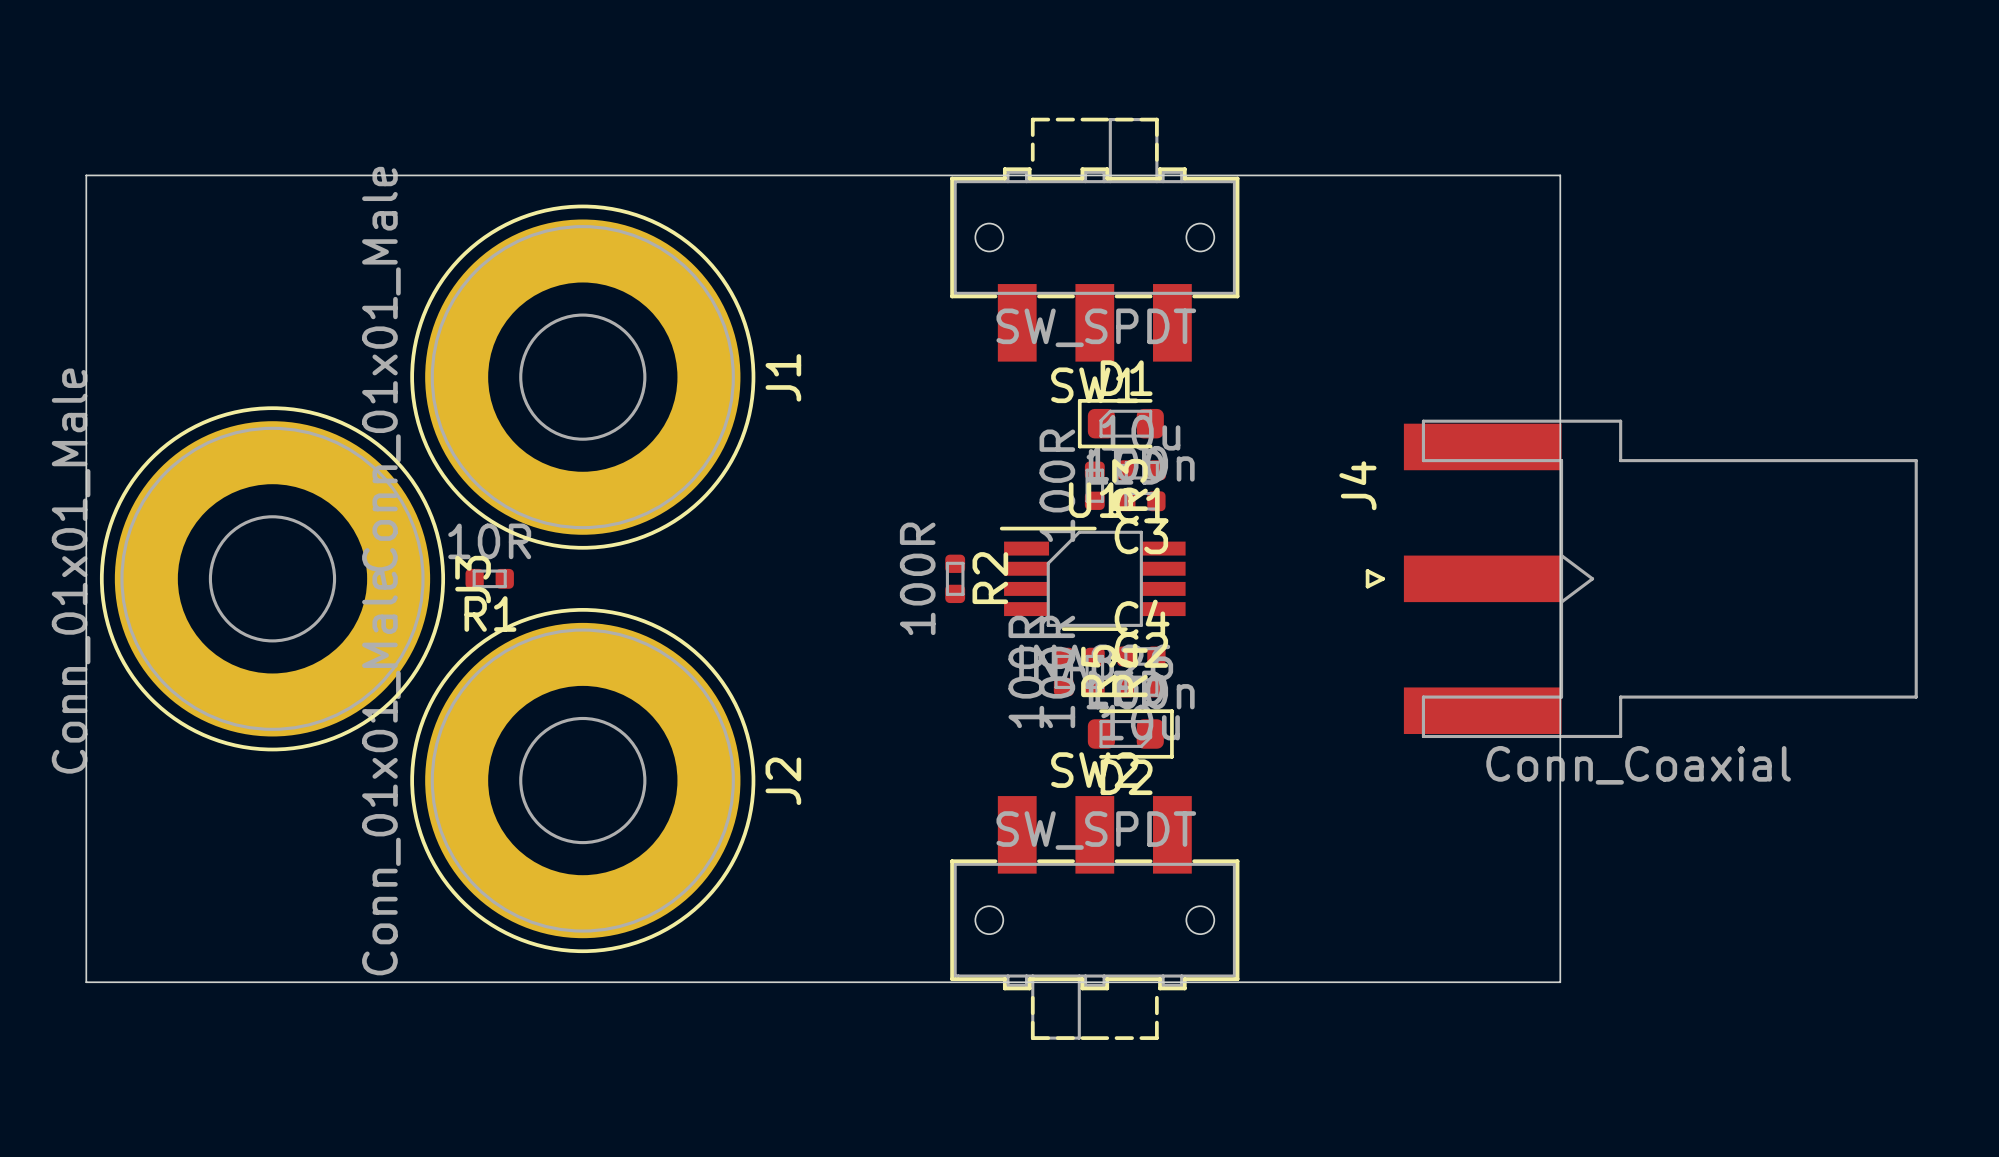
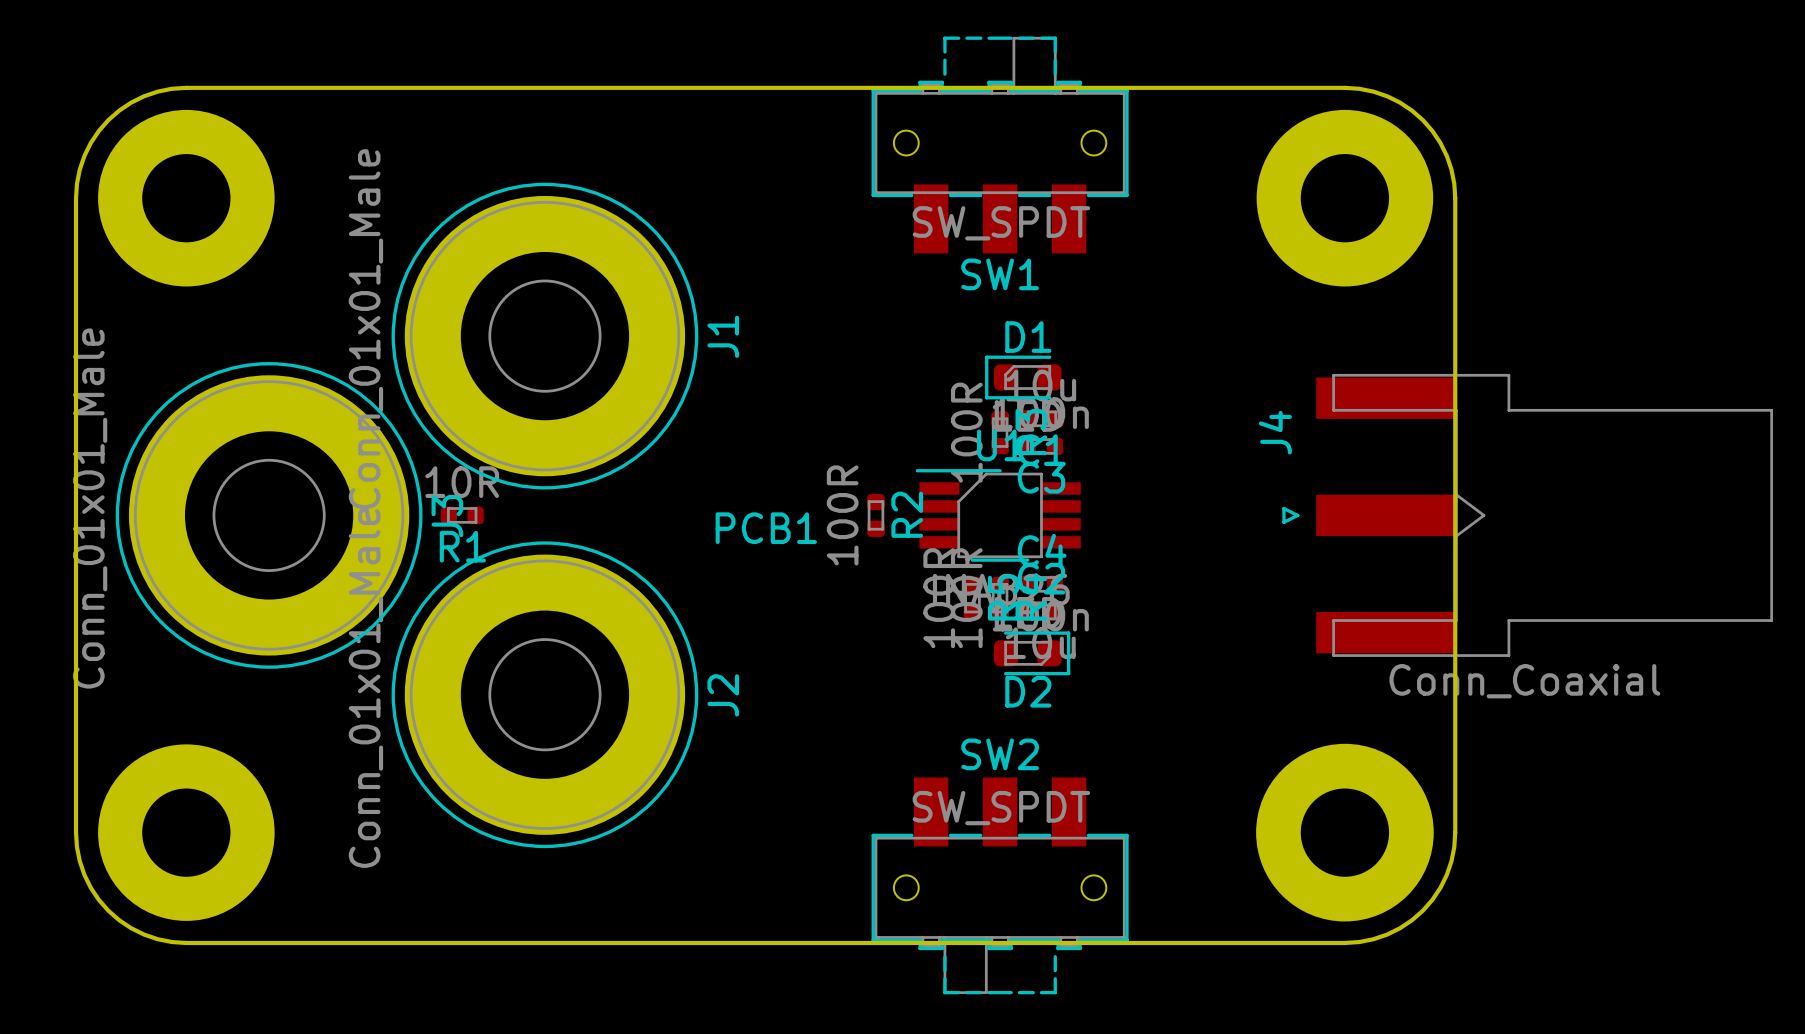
board edge: (86, 175) (1560, 175) (1560, 982) (86, 982) (86, 175) -> none
SW1 position: (1094, 239) -> (1000, 144)
PCB1: none -> (765, 515)
J4 position: (1641, 578) -> (1527, 515)
SW2 position: (1094, 918) -> (1000, 885)

